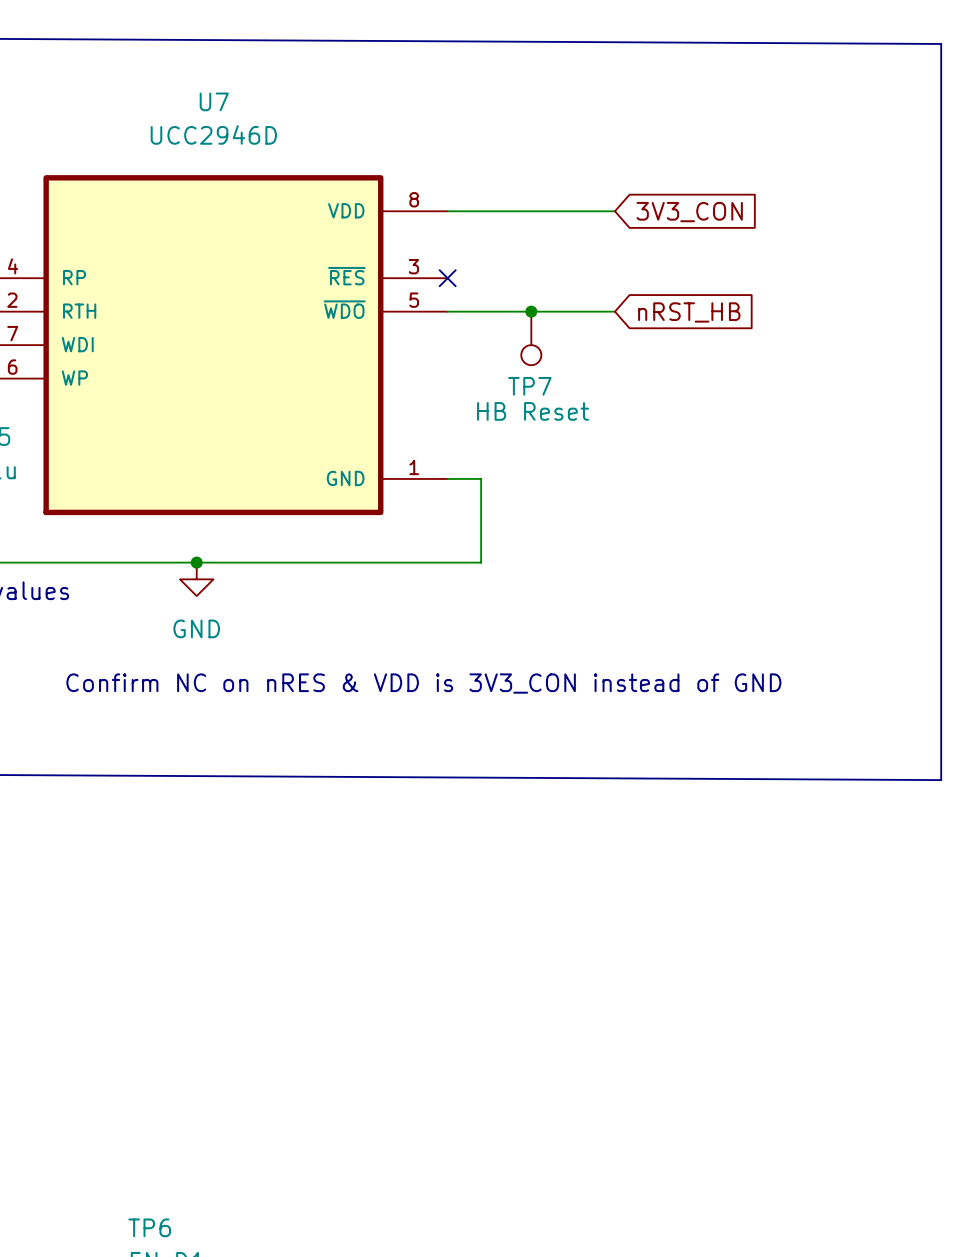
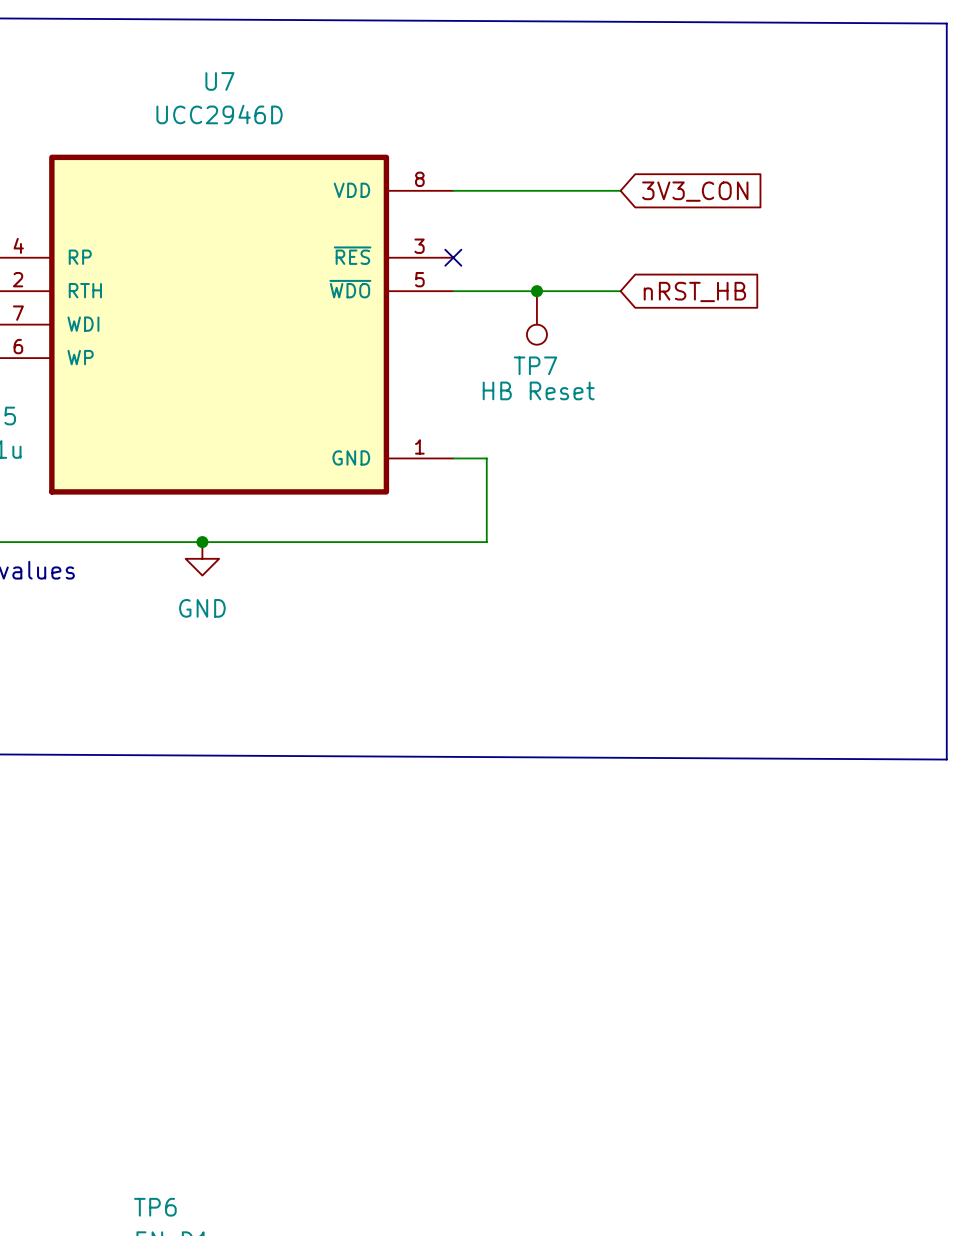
text: Confirm NC on nRES & VDD is 3V3_CON instead of GND (423, 683) -> none

